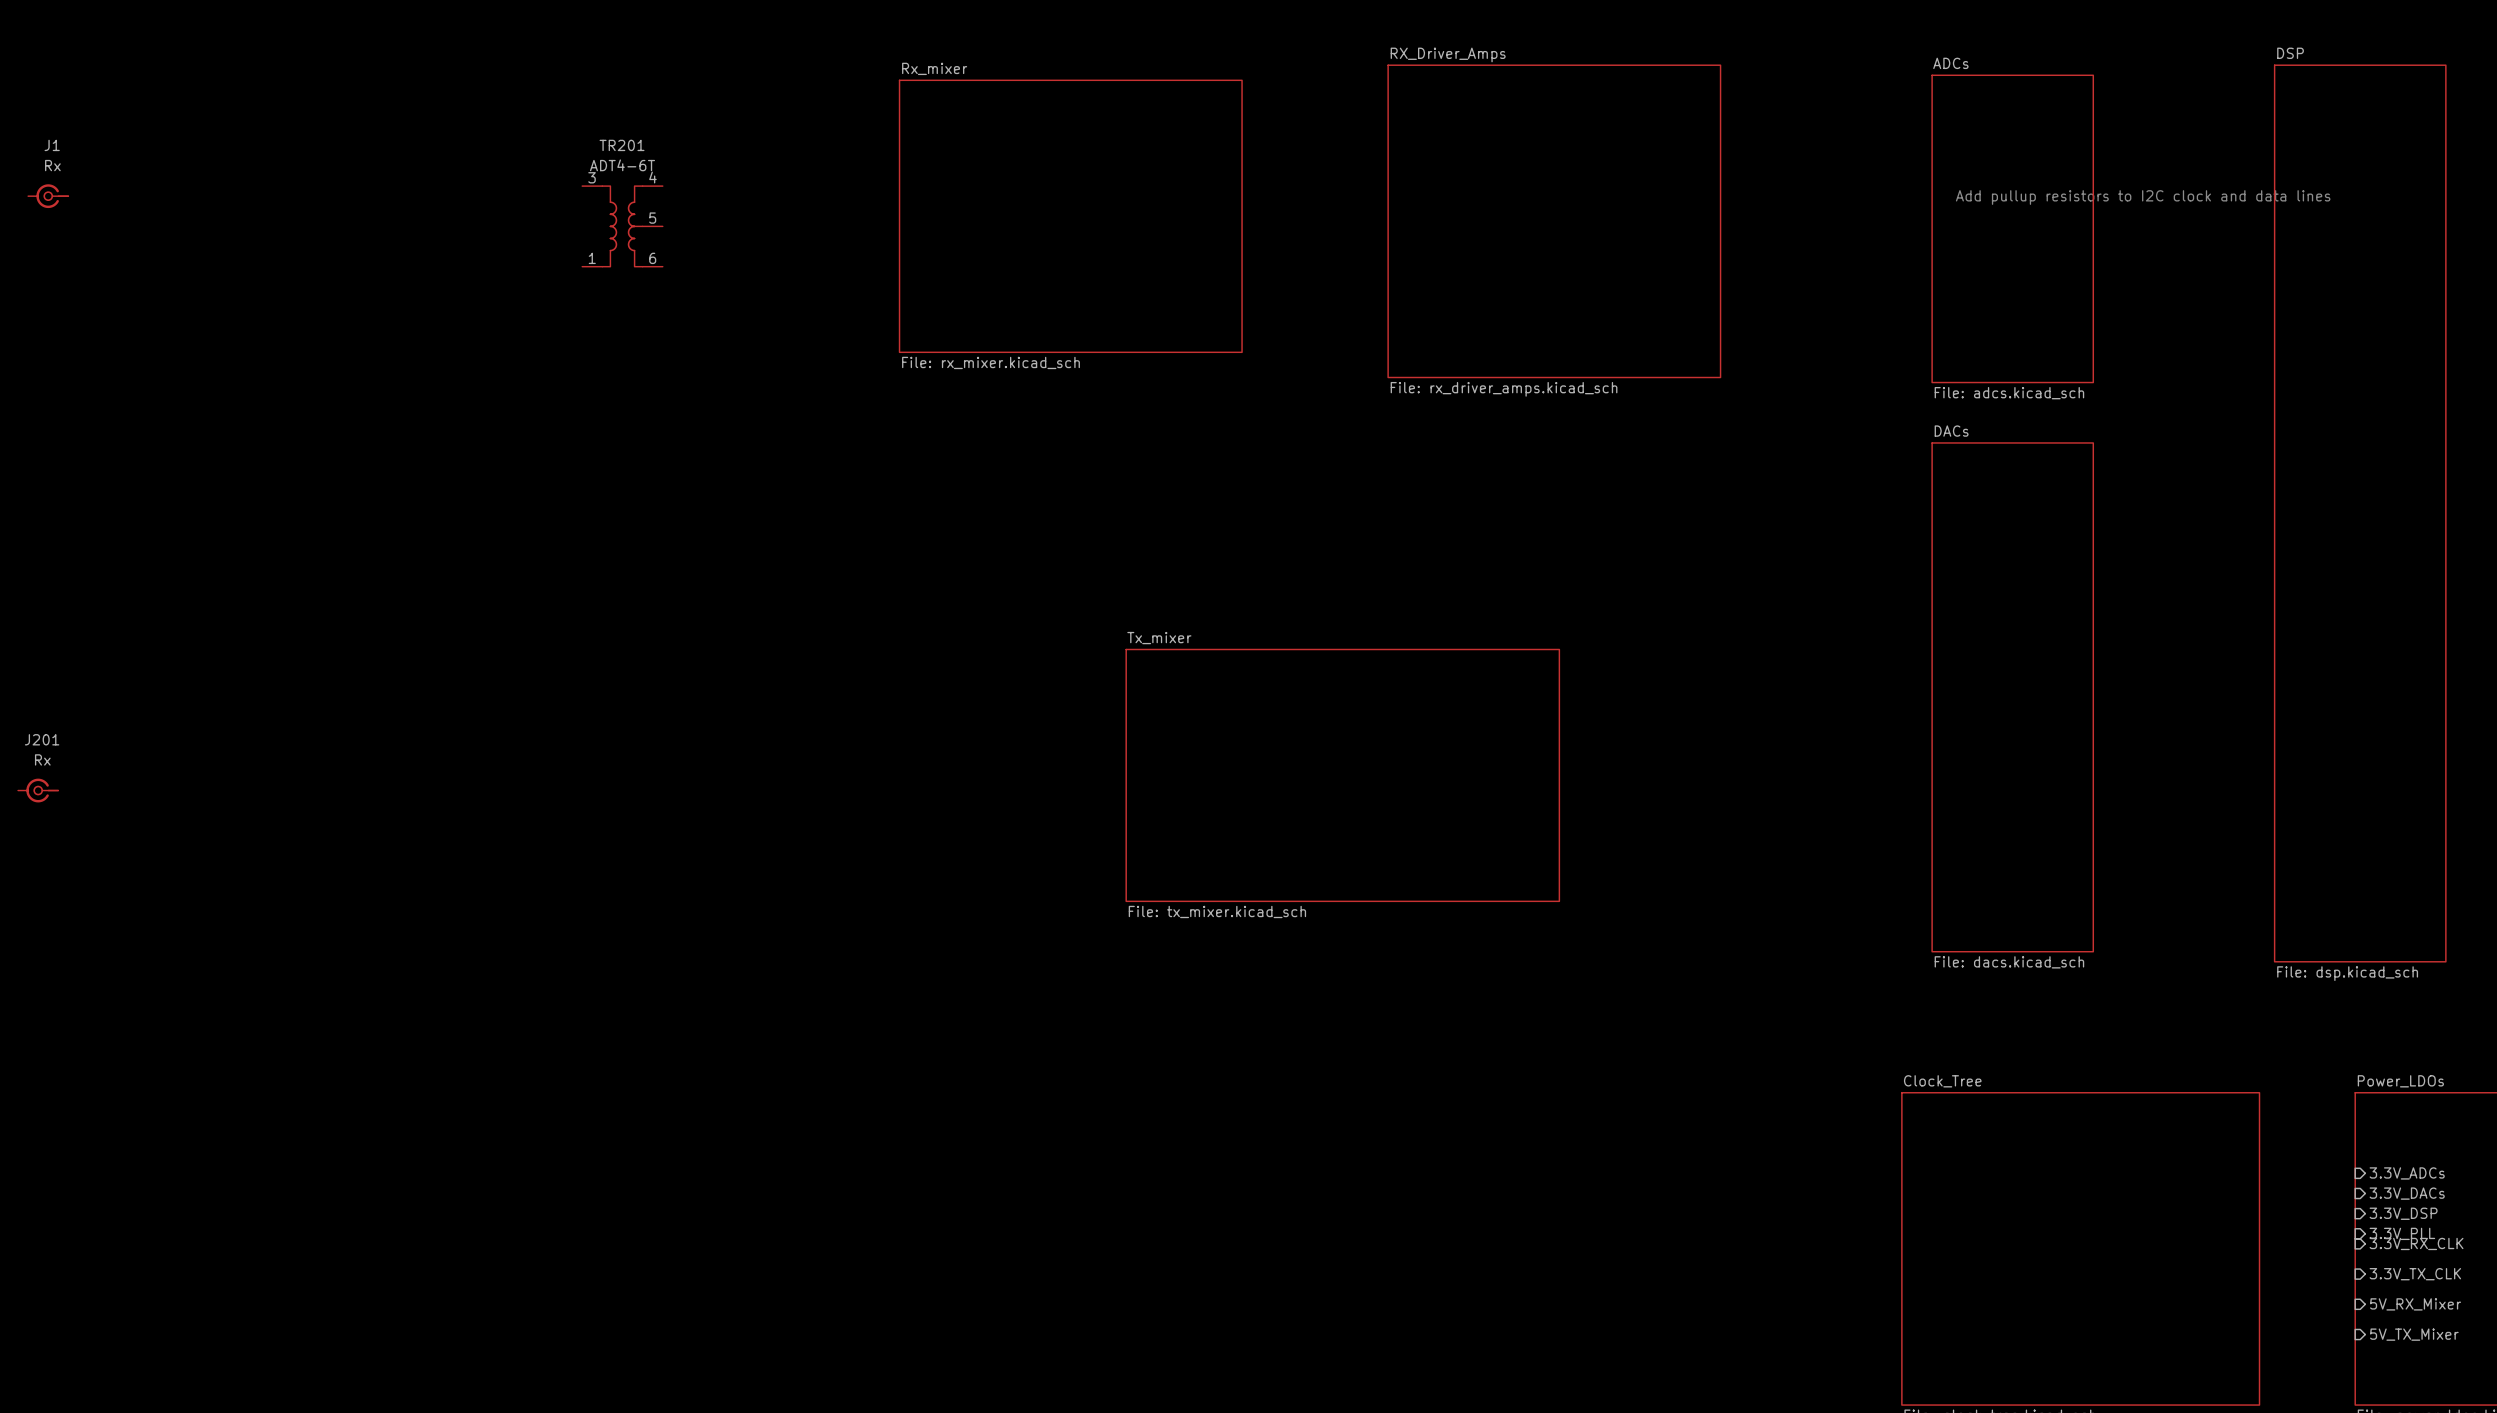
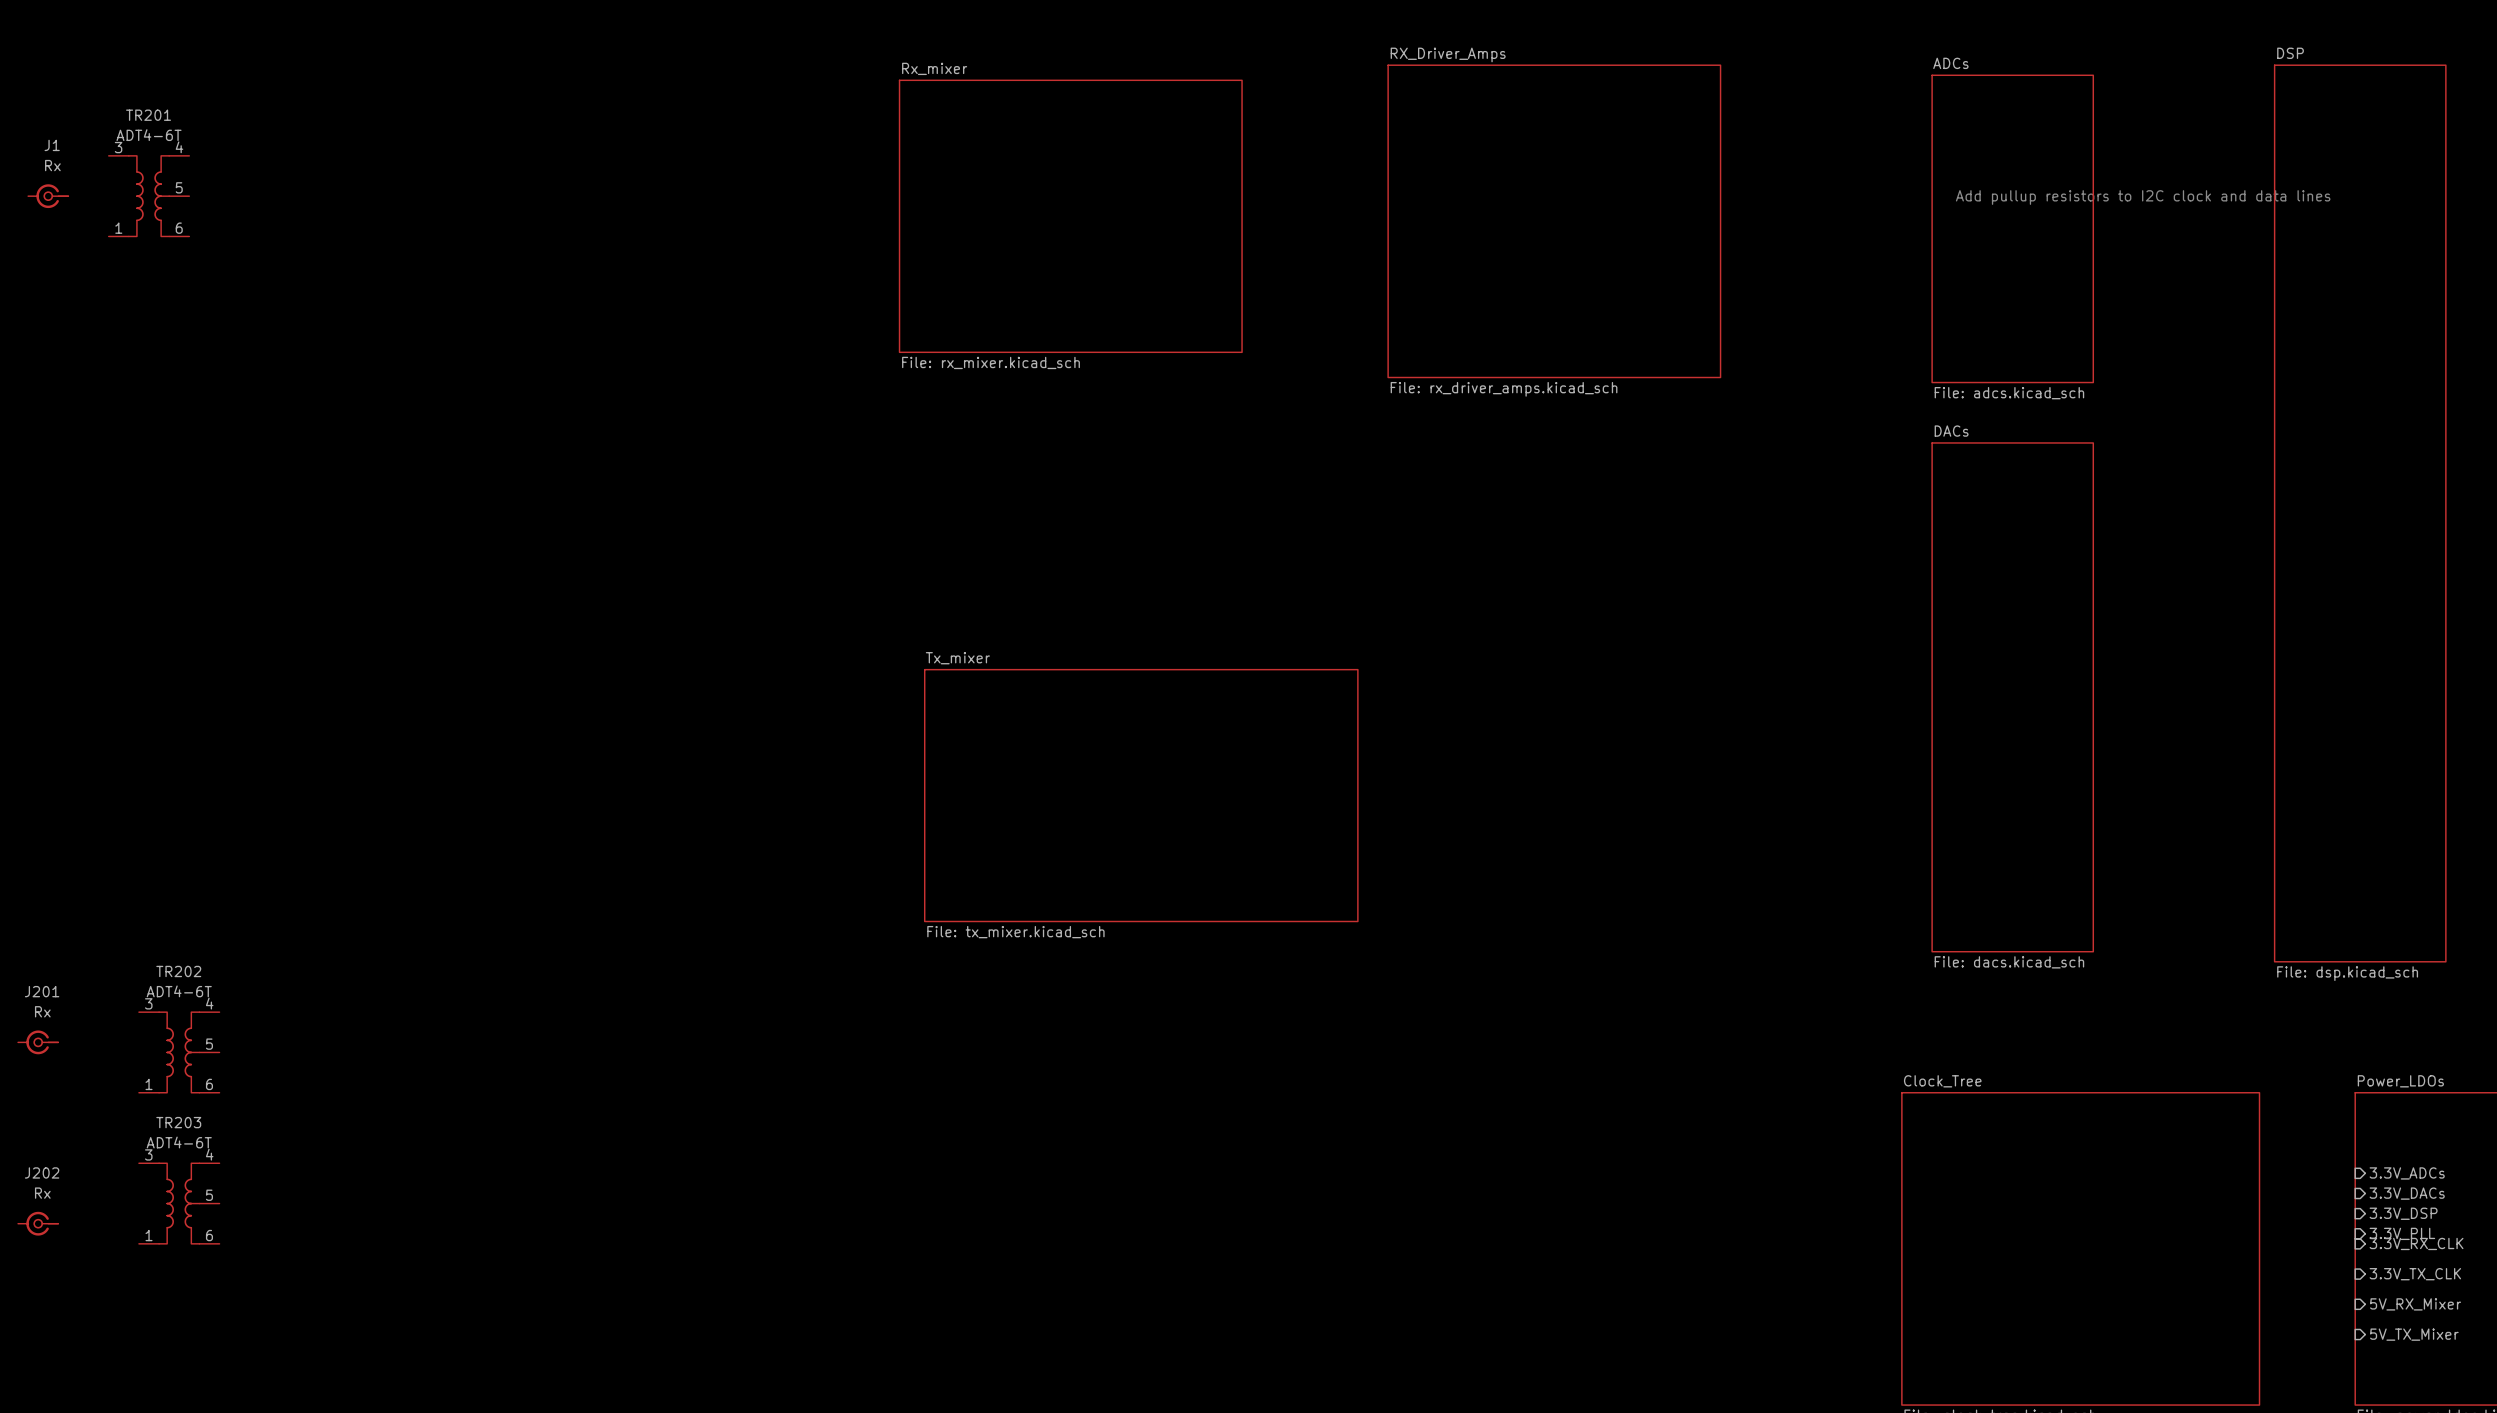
TR201 position: (622, 226) -> (149, 196)
sheet Tx_mixer: File: tx_mixer.kicad_sch (1342, 775) -> none
J201 position: (38, 790) -> (38, 1042)
sheet Tx_mixer: none -> File: tx_mixer.kicad_sch (1141, 795)
TR202: none -> ADT4-6T (179, 1052)
TR203: none -> ADT4-6T (179, 1203)
J202: none -> Rx (38, 1223)

